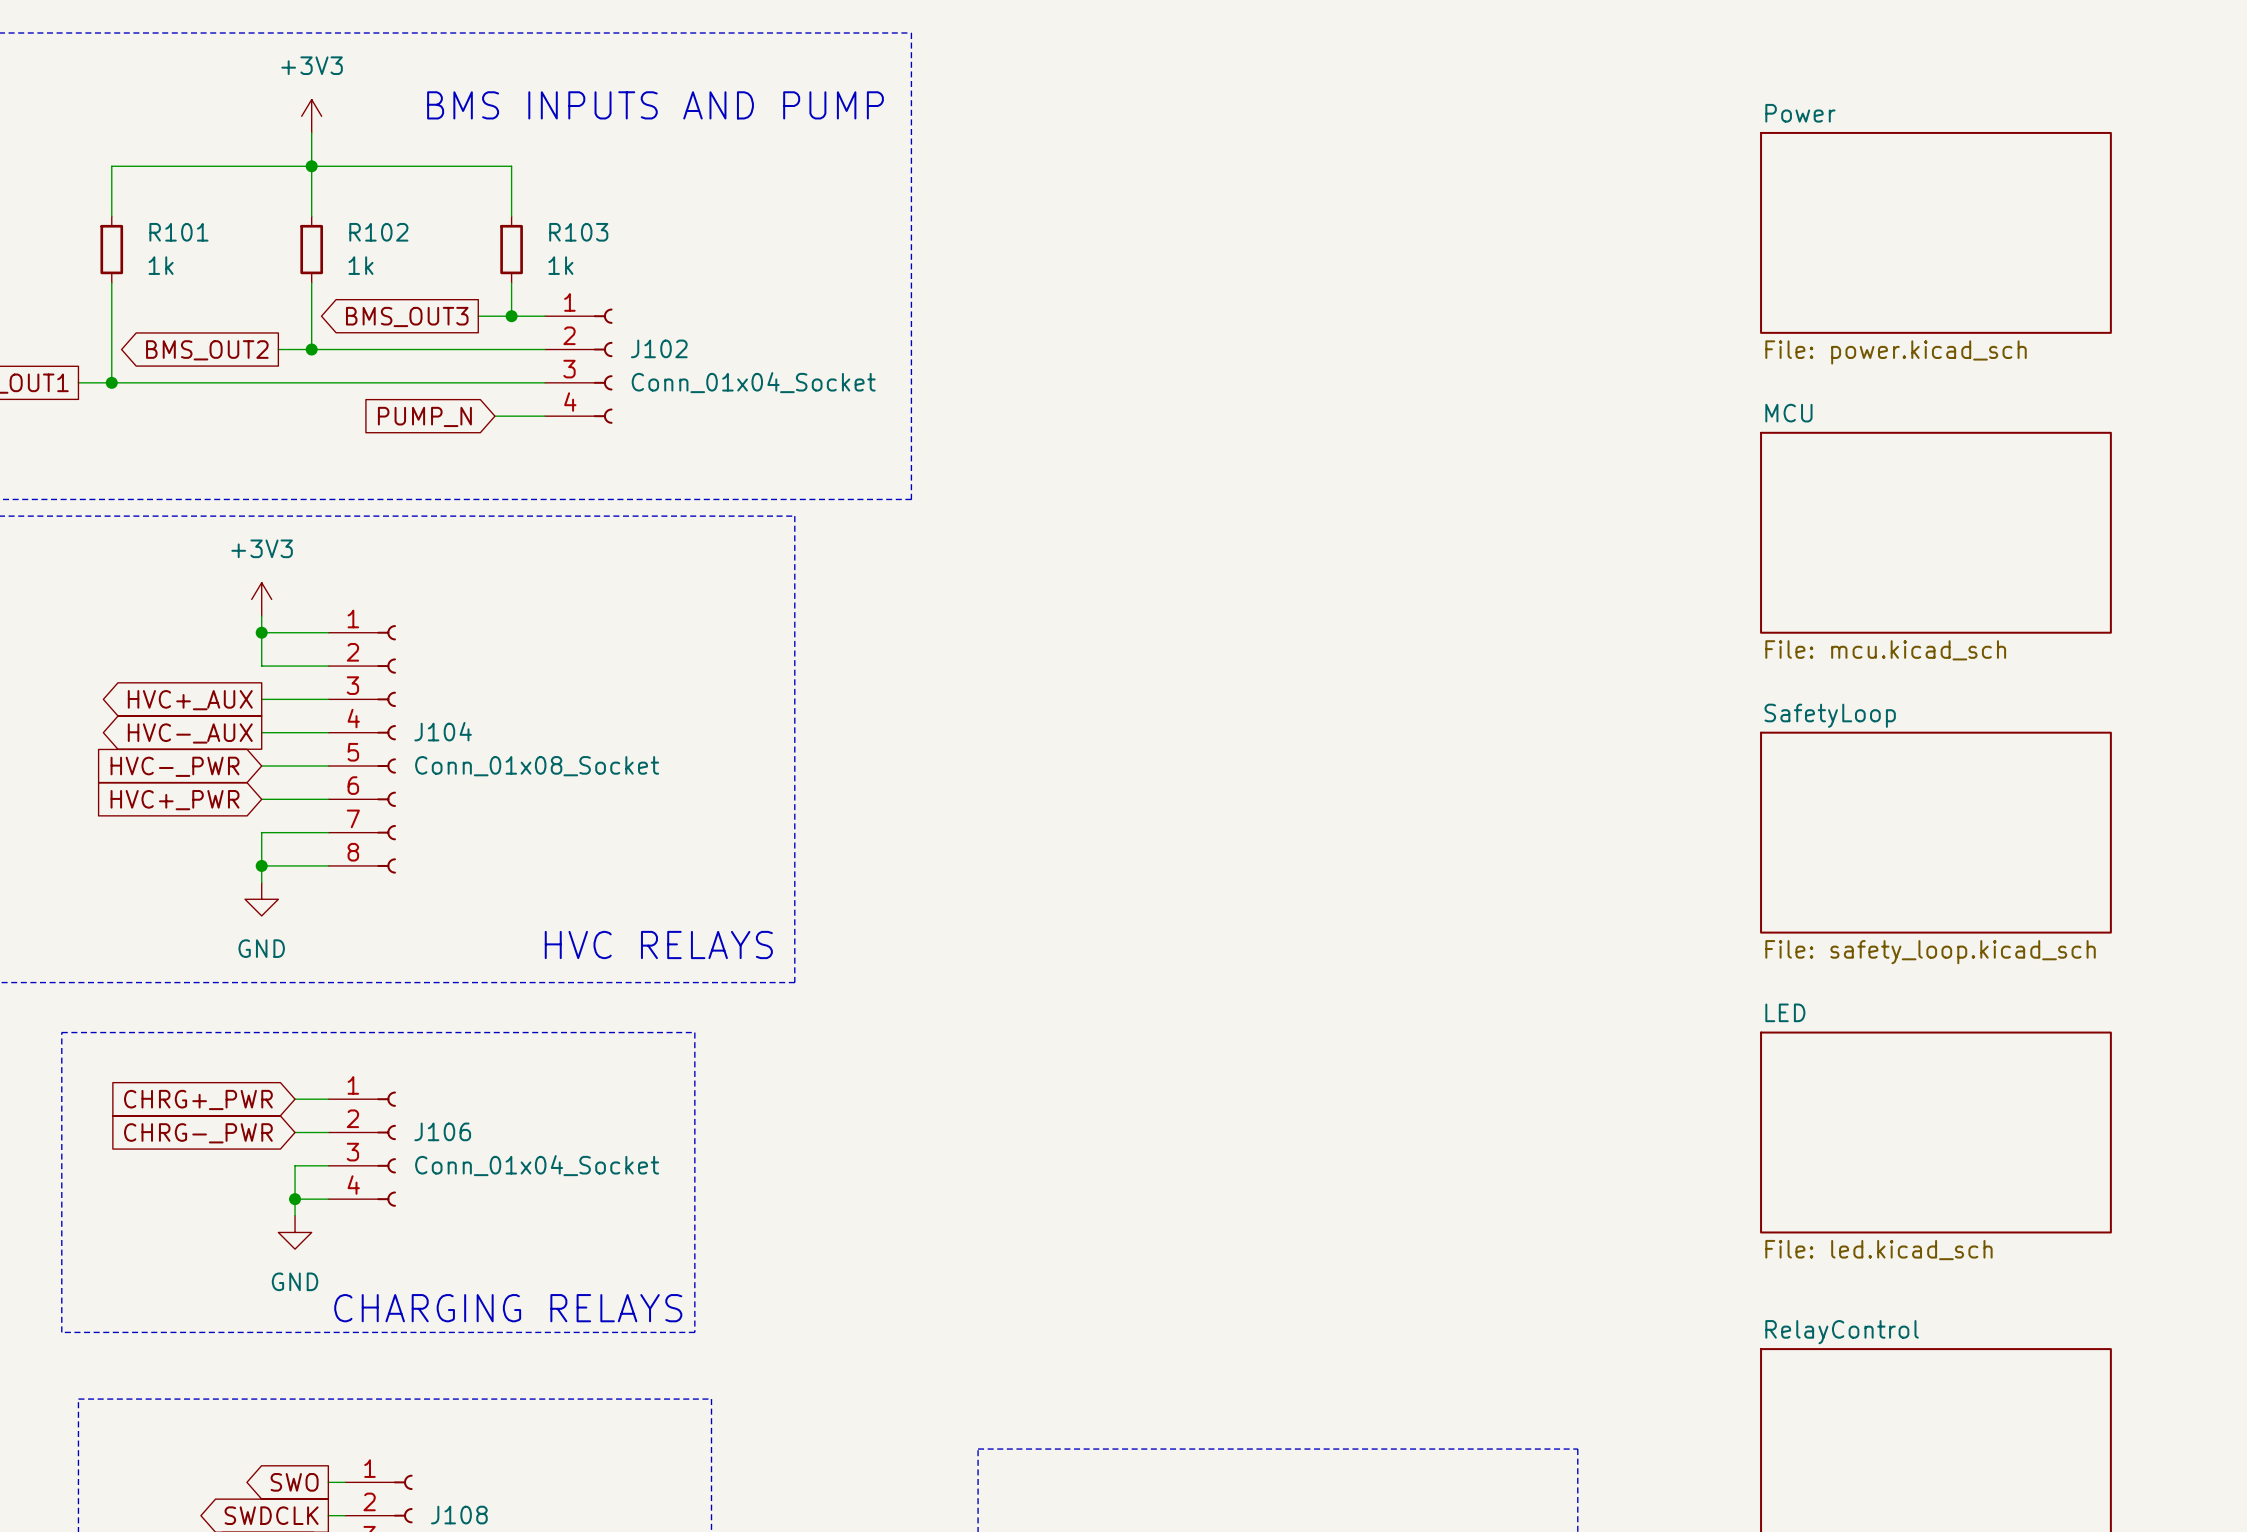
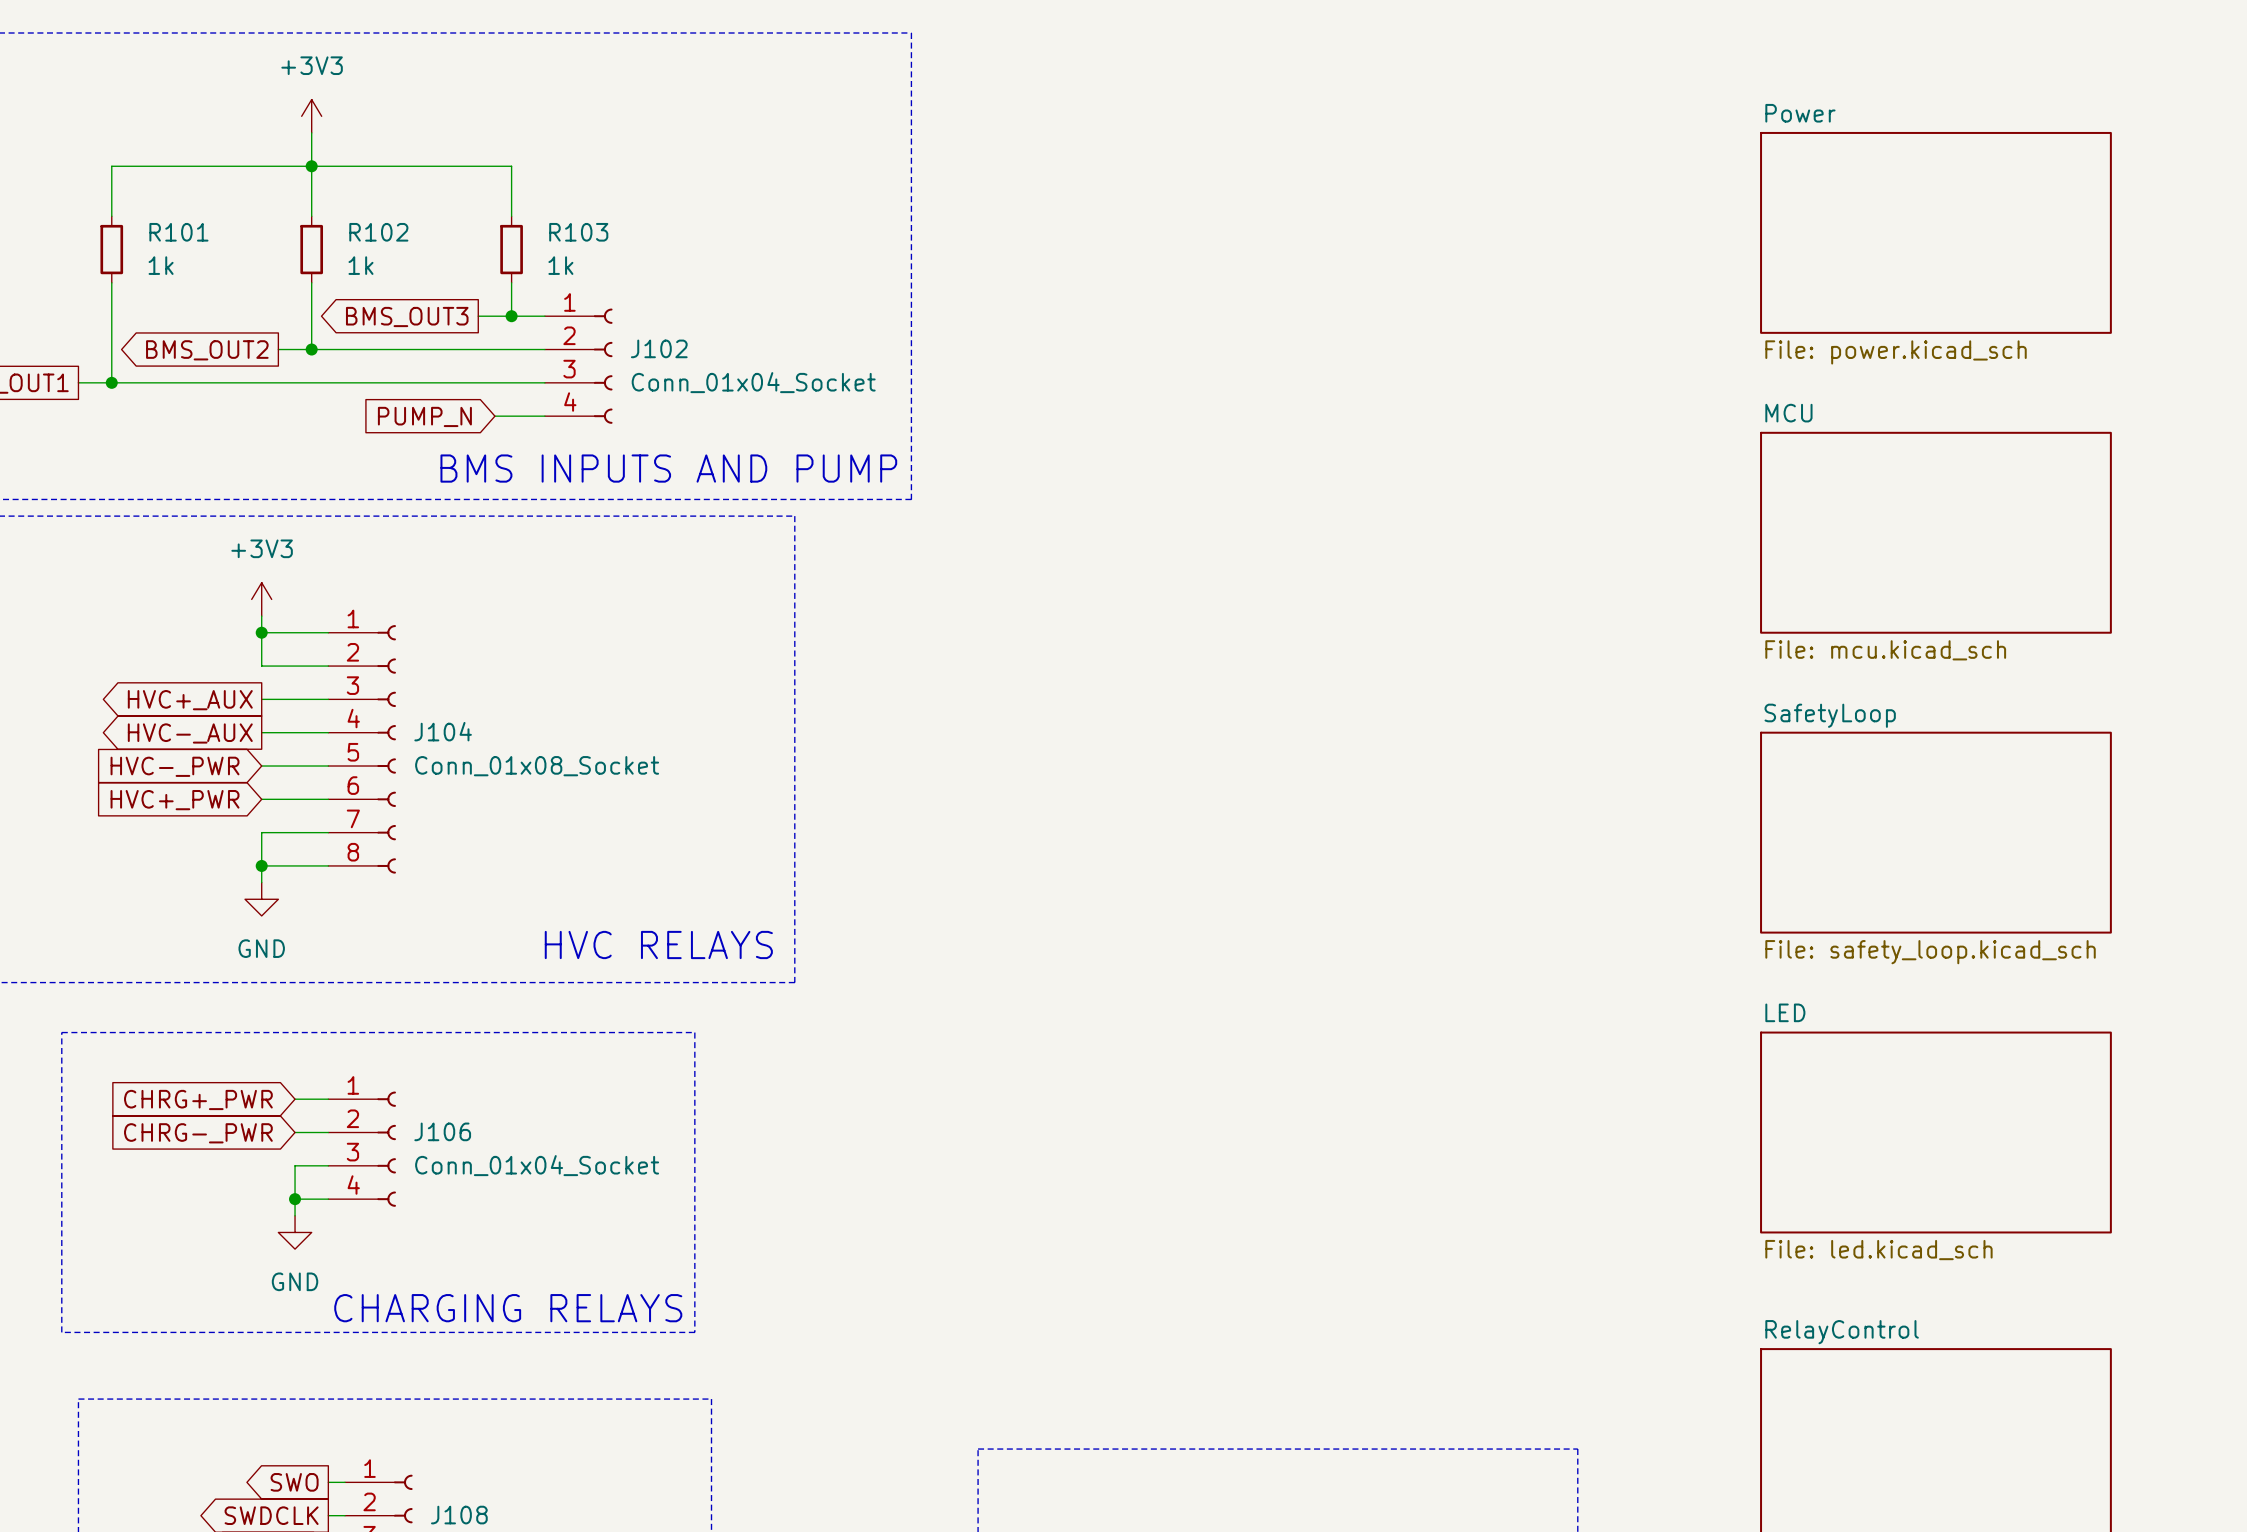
text: BMS INPUTS AND PUMP (655, 105) -> none
text: none -> BMS INPUTS AND PUMP (668, 468)

